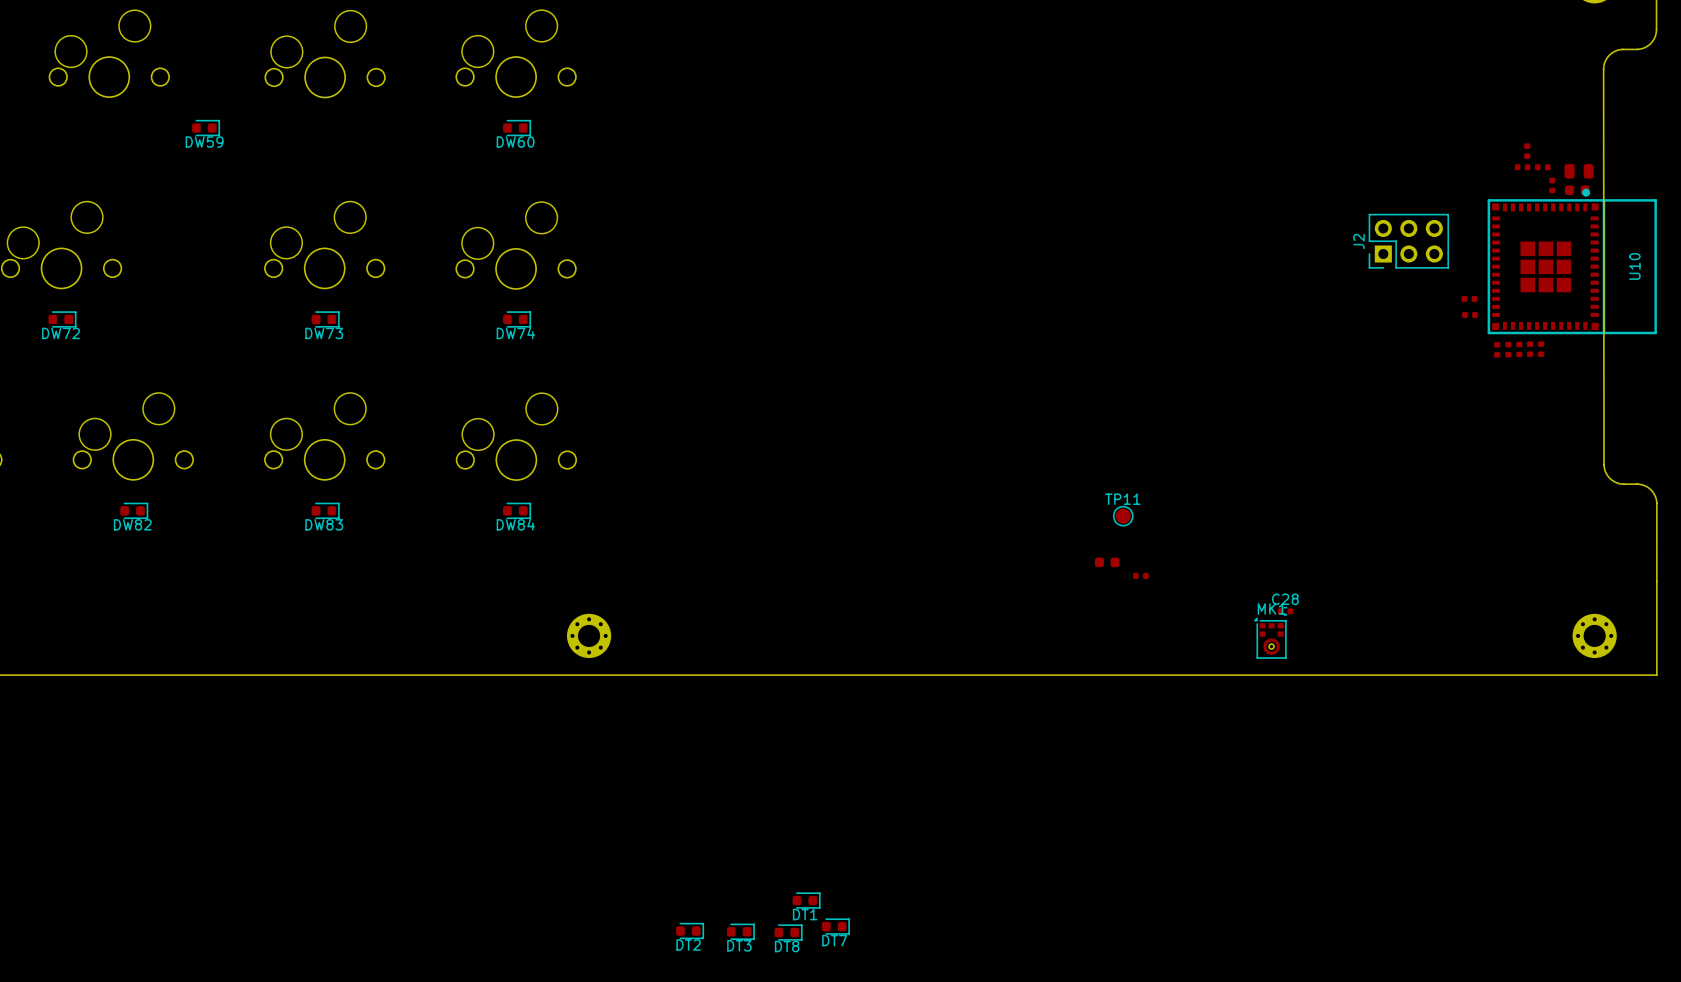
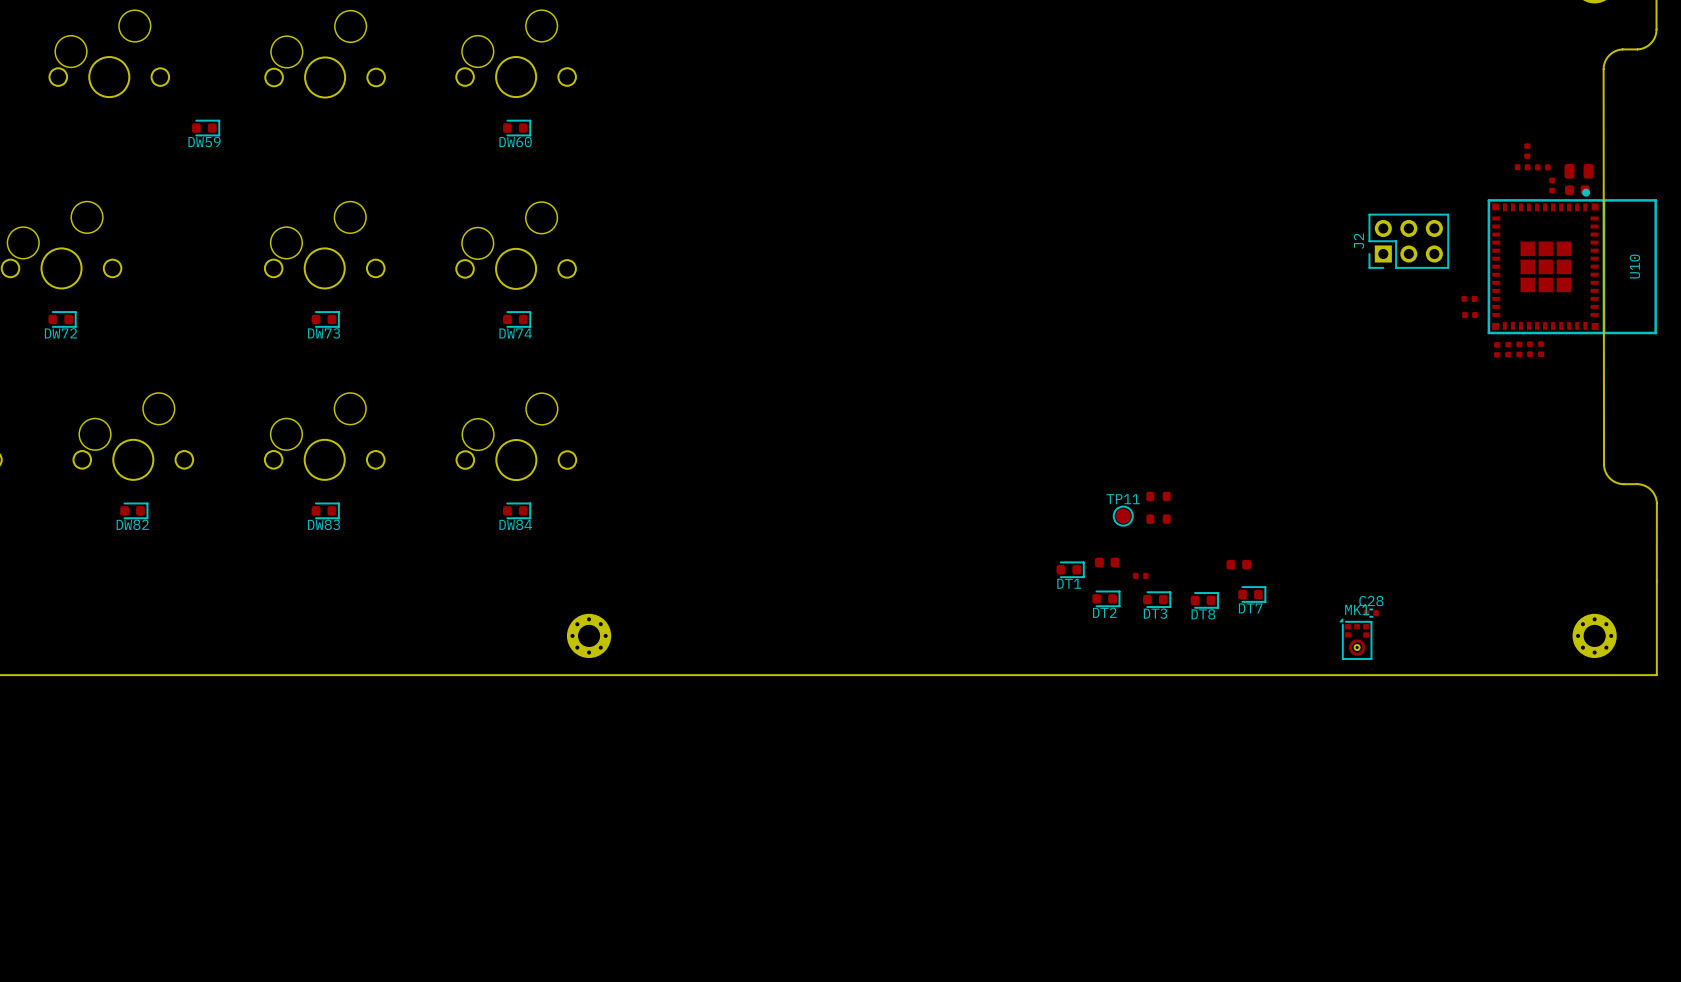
part: none -> (1158, 496)
part: none -> (1158, 519)
part: none -> (1238, 564)
C28 position: (1285, 611) -> (1371, 613)
MK1 position: (1270, 638) -> (1355, 638)
DT1 position: (806, 900) -> (1070, 569)
DT7 position: (835, 926) -> (1252, 594)
DT2 position: (689, 931) -> (1106, 598)
DT3 position: (740, 931) -> (1157, 599)
DT8 position: (788, 932) -> (1204, 600)

